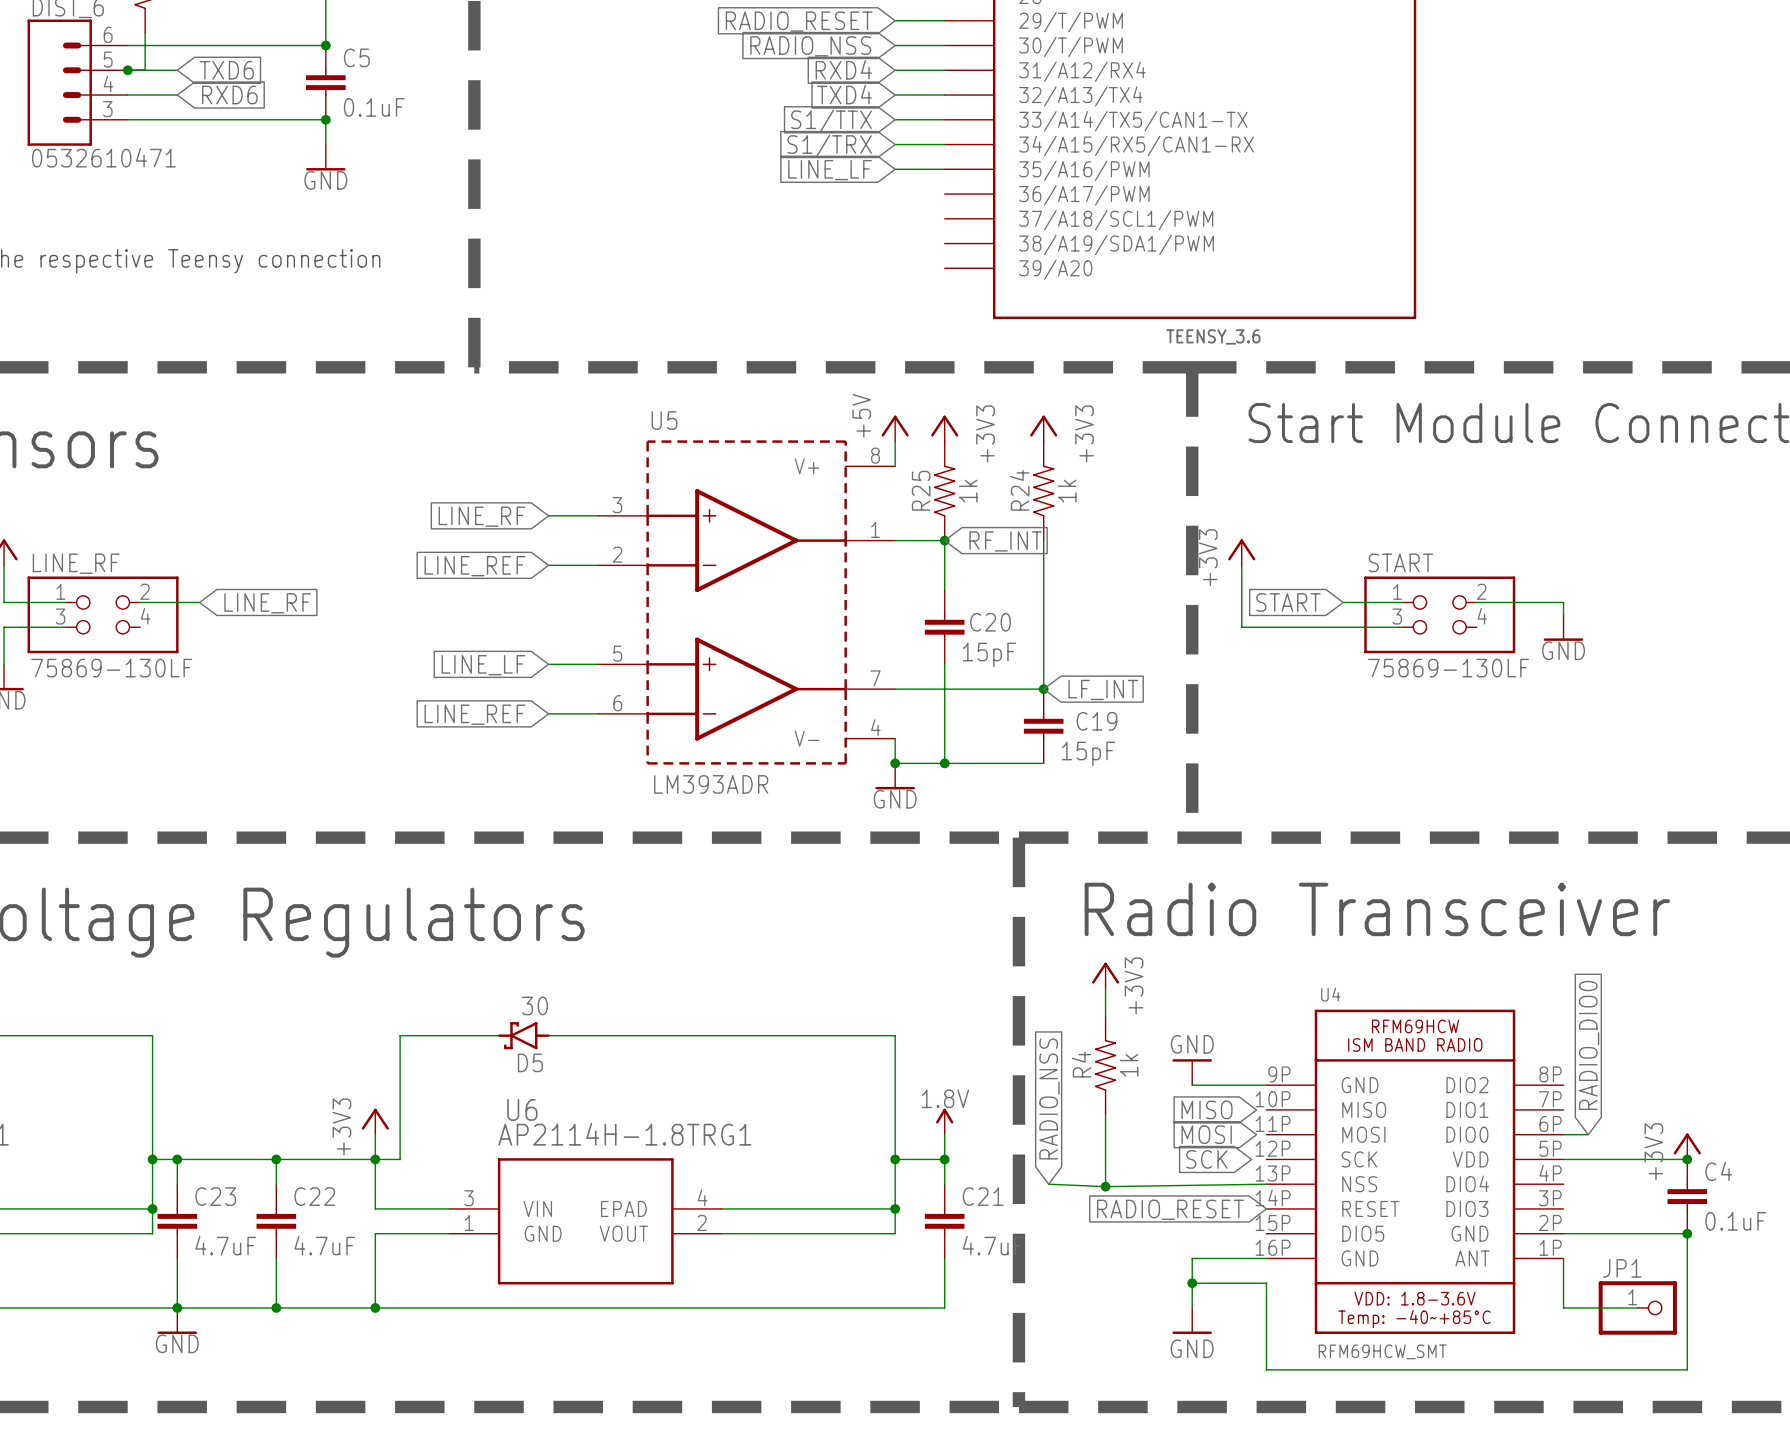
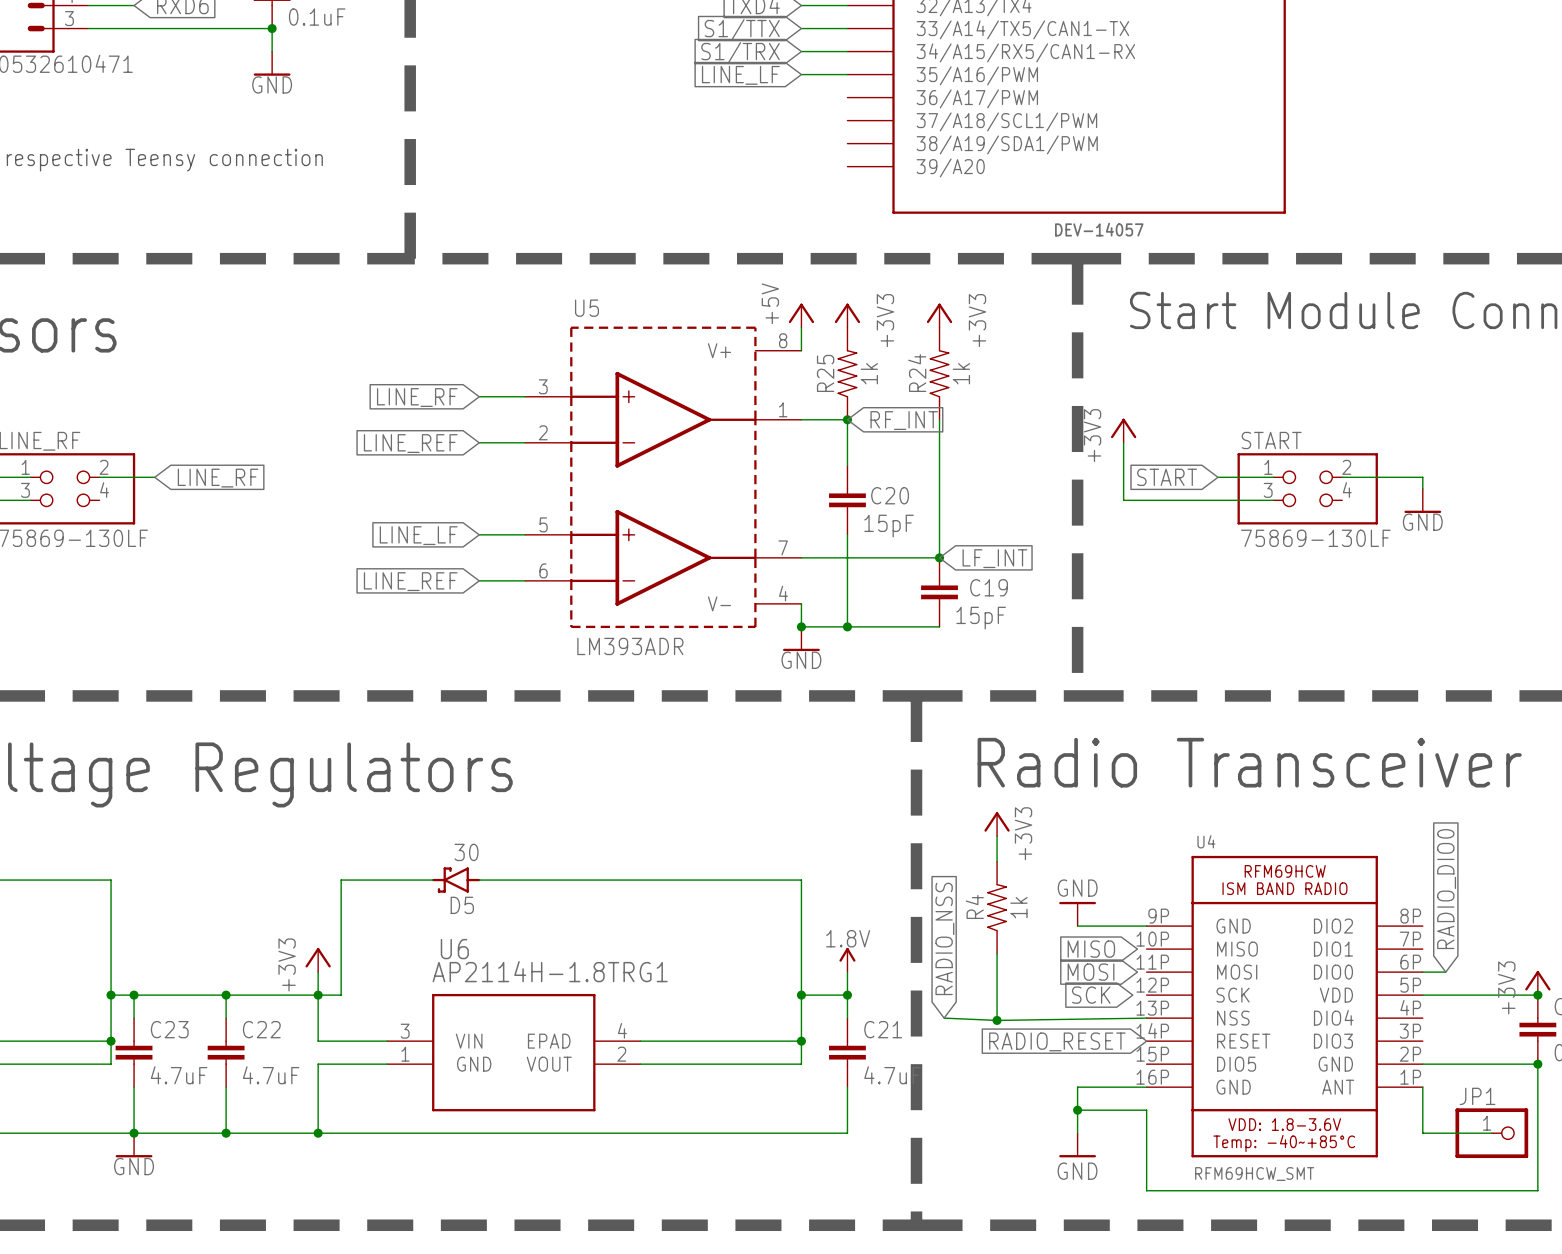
part value: TEENSY_3.6 (1213, 336) -> DEV-14057 (1099, 229)

